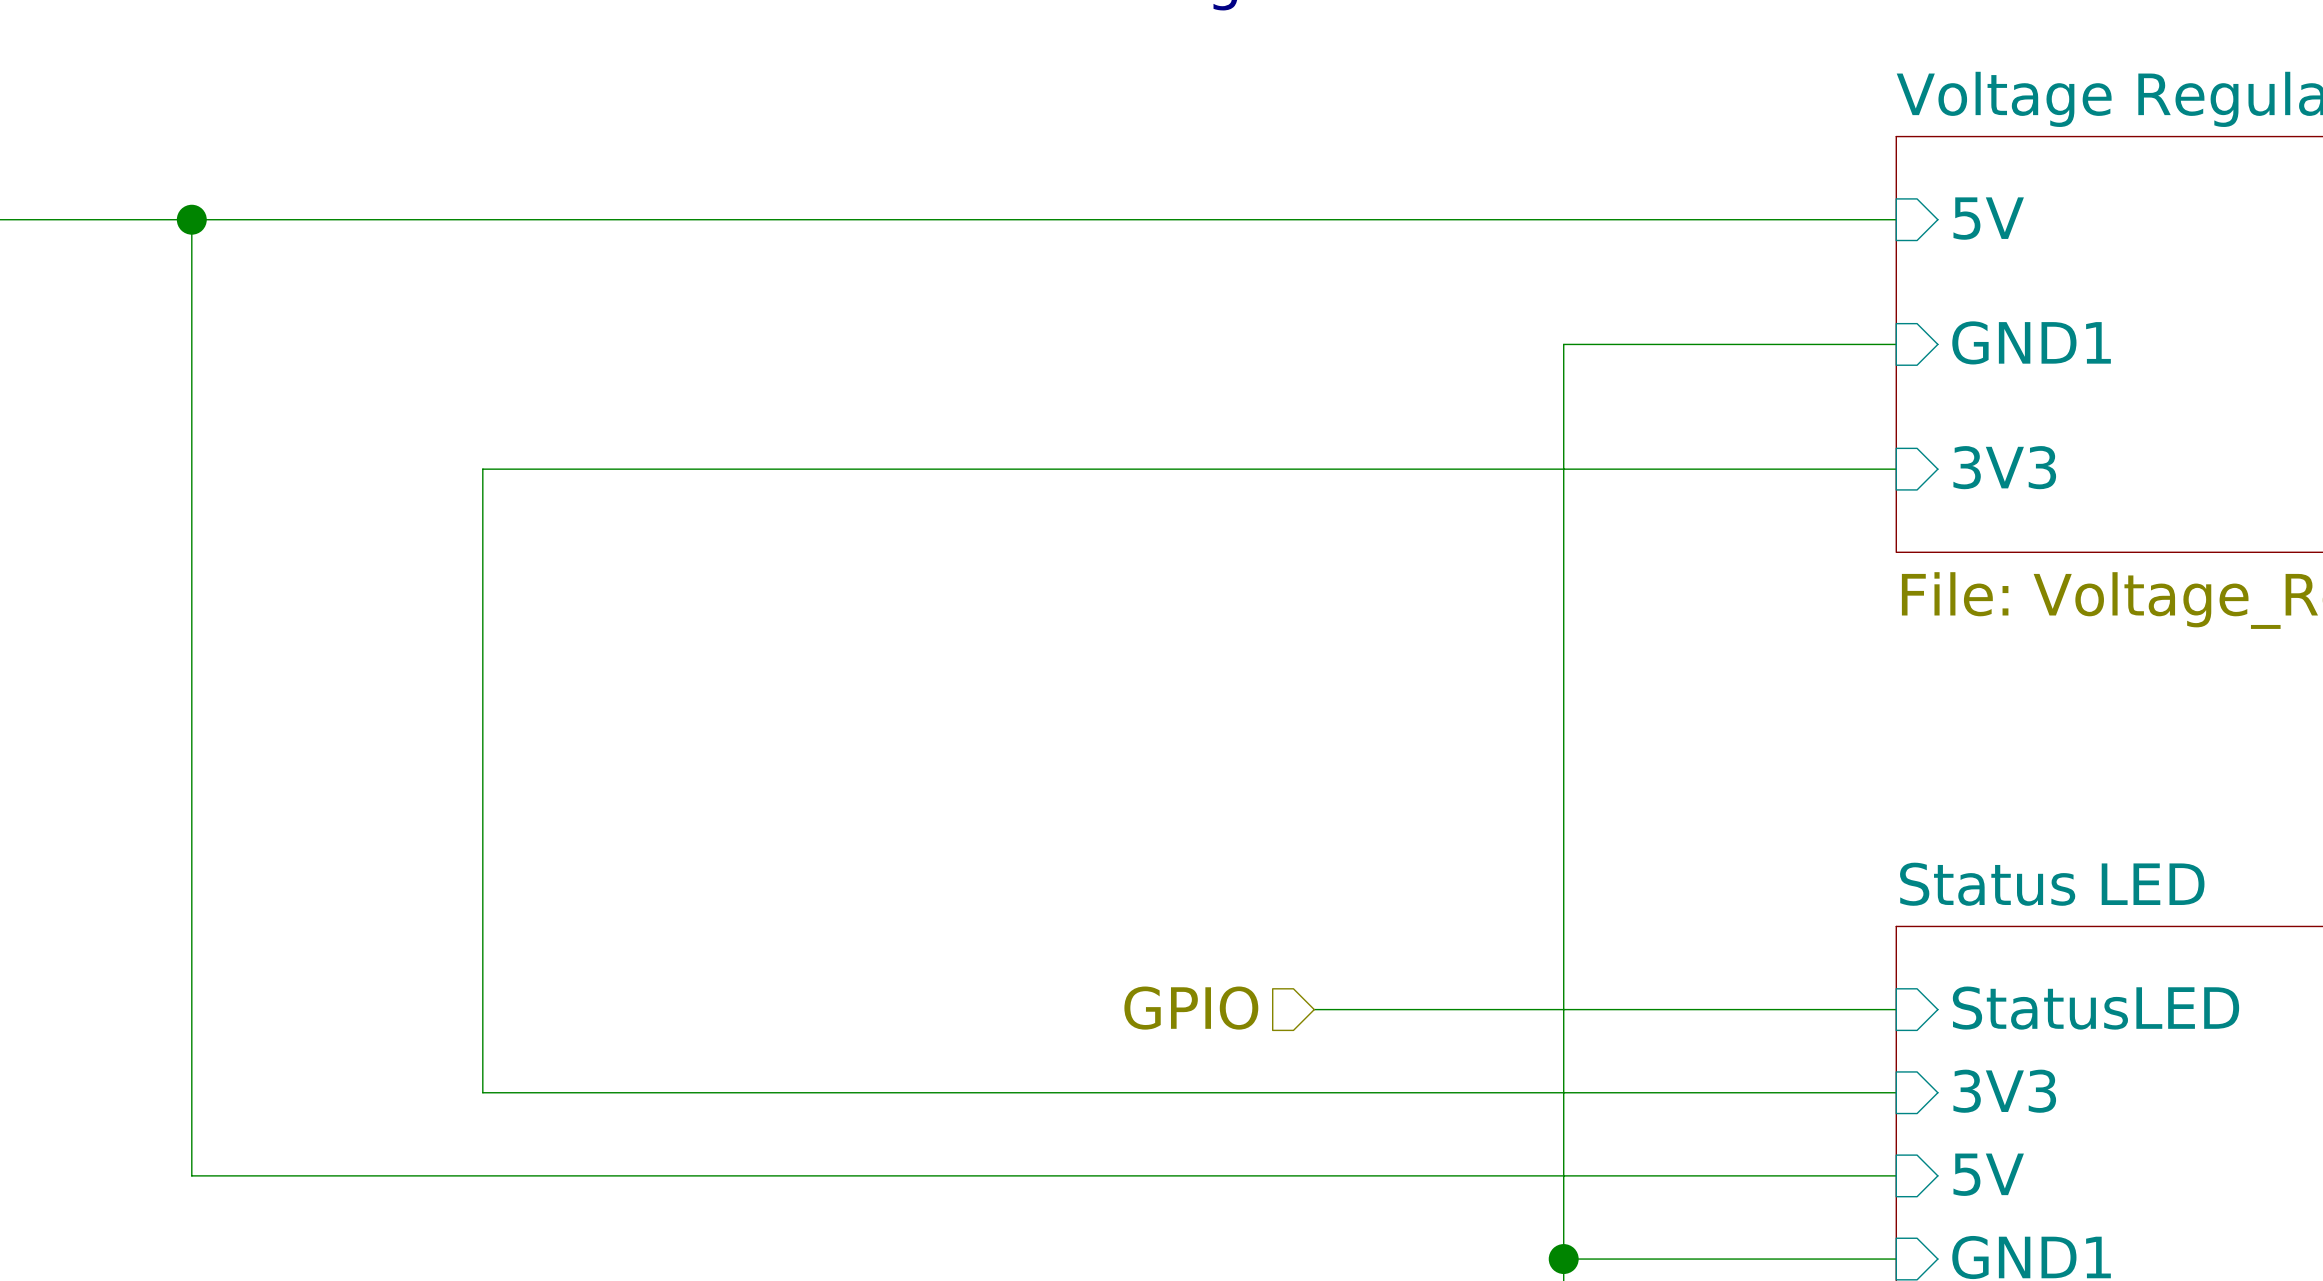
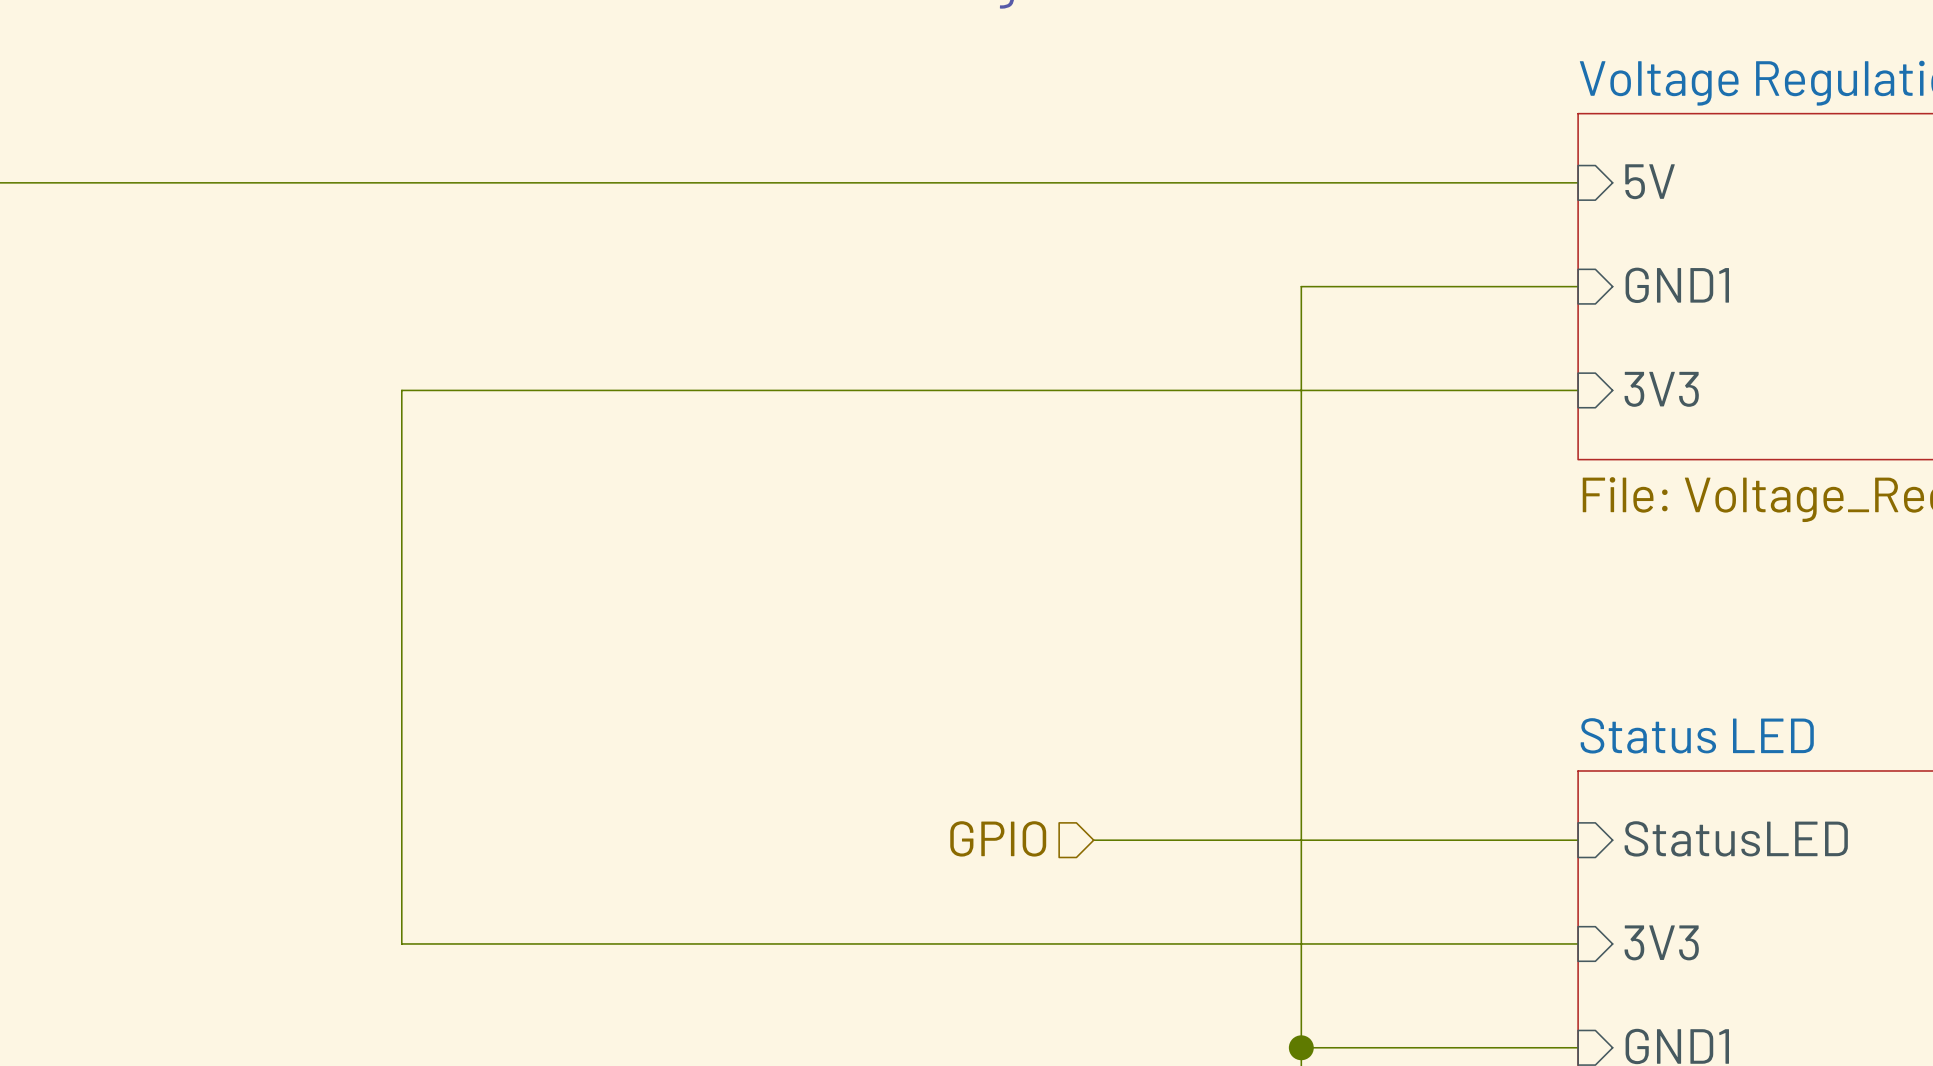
wire: (191, 219) (191, 1175) (1896, 1175) -> none
junction: (191, 219) -> none
sheet pin position: 3V3 (2004, 1091) -> 3V3 (1661, 942)
wire: (482, 1092) (1896, 1092) -> (401, 909) (401, 943) (1578, 943)
sheet pin: 5V (1988, 1174) -> none

